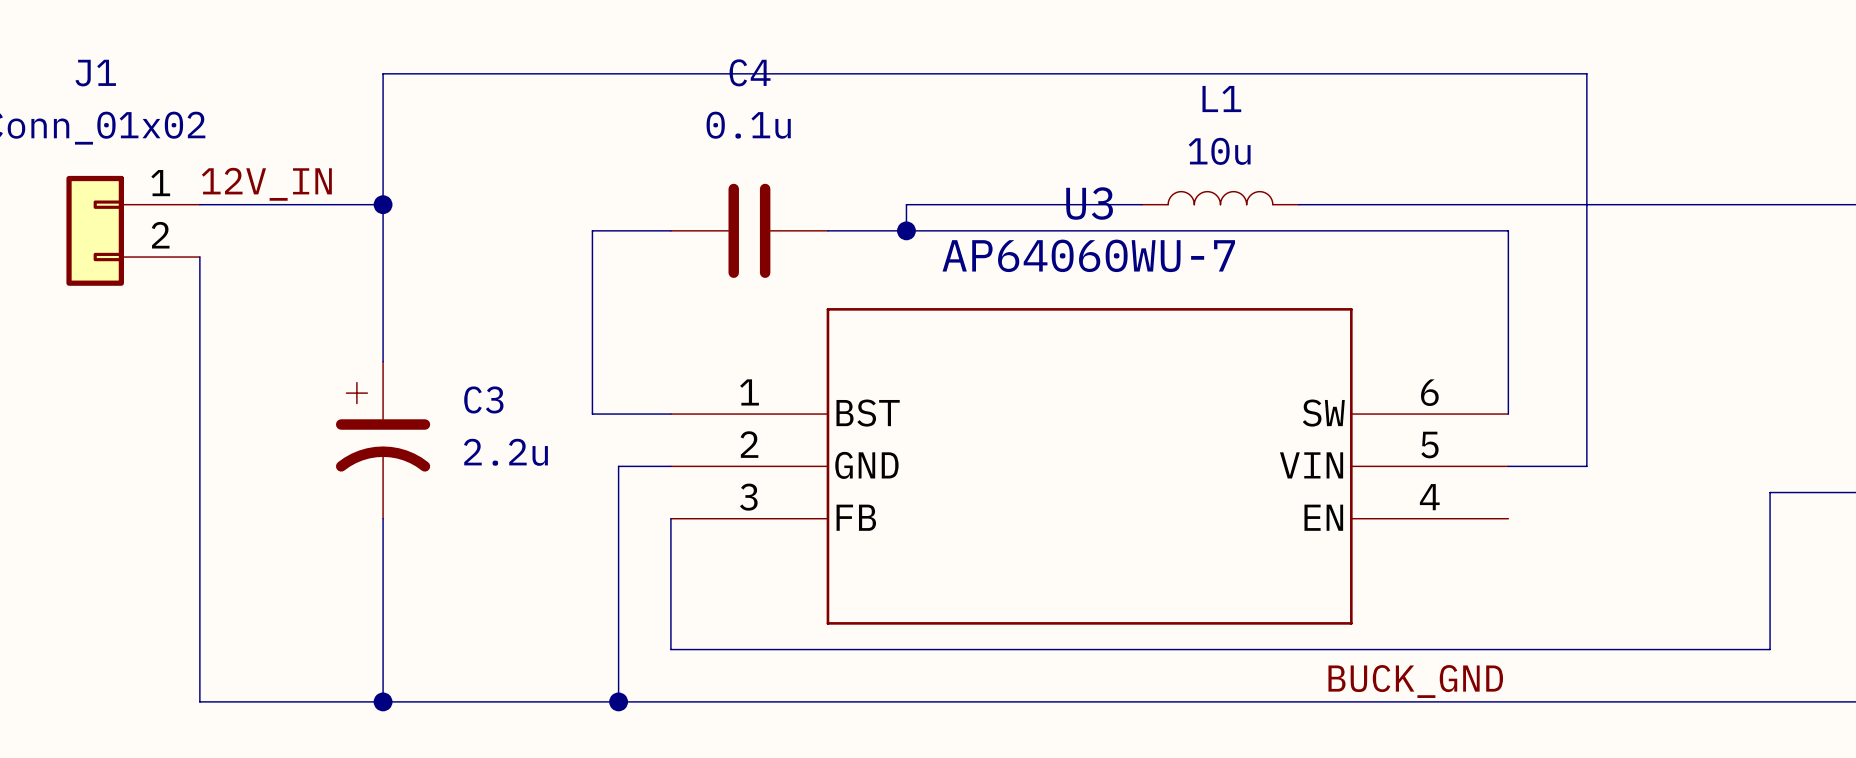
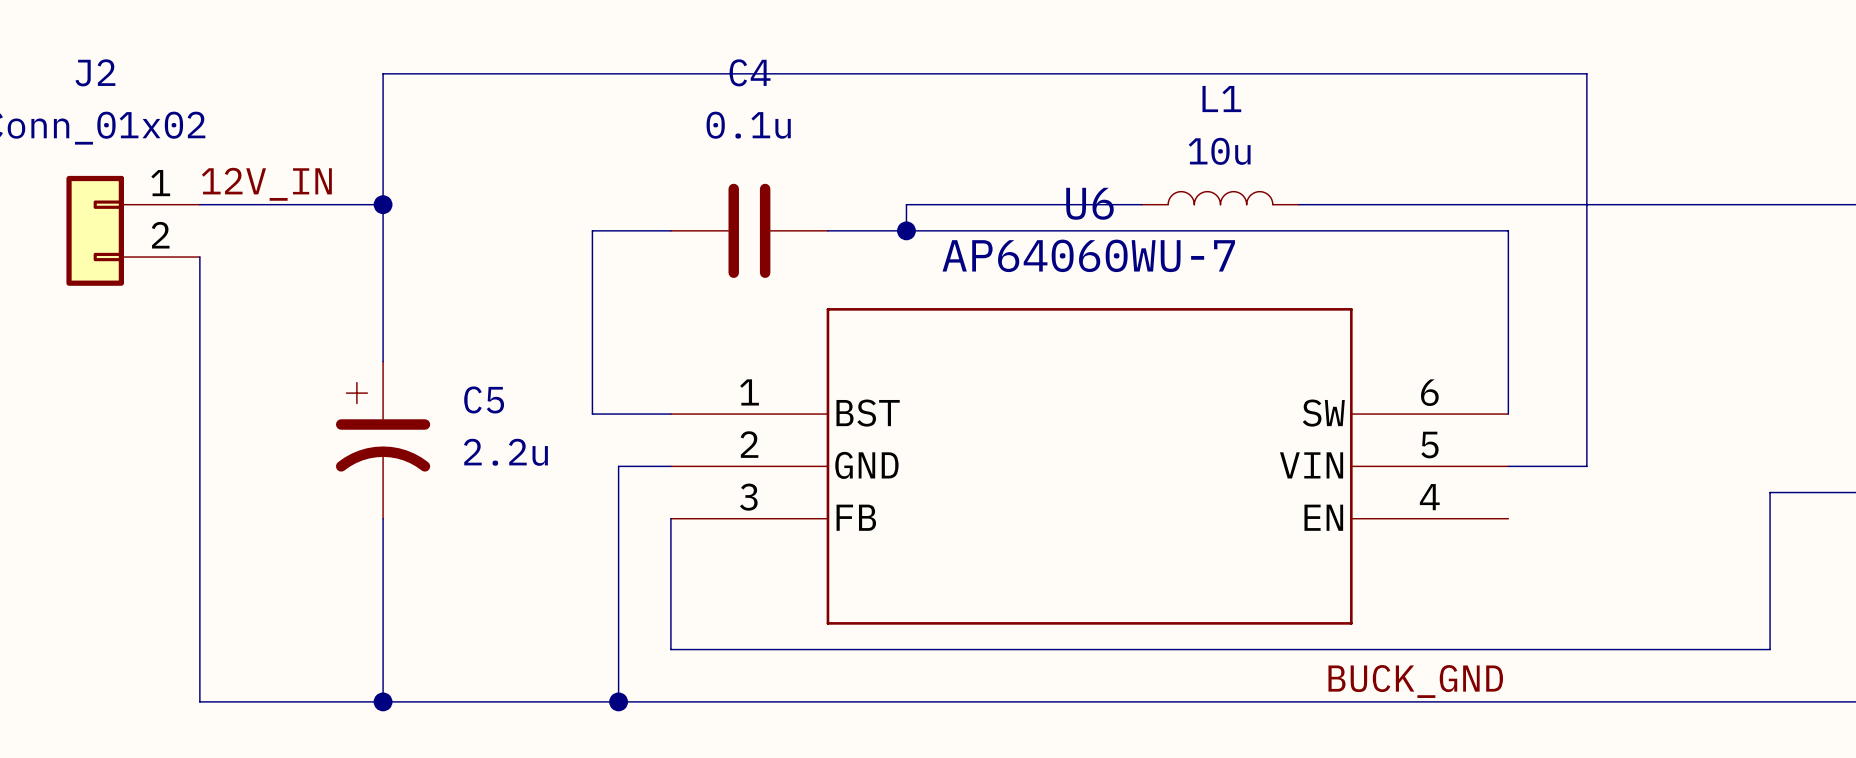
J1 name: J1 (95, 73) -> J2 (95, 72)
U3 name: U3 (1089, 203) -> U6 (1090, 203)
C3 name: C3 (483, 399) -> C5 (484, 399)

